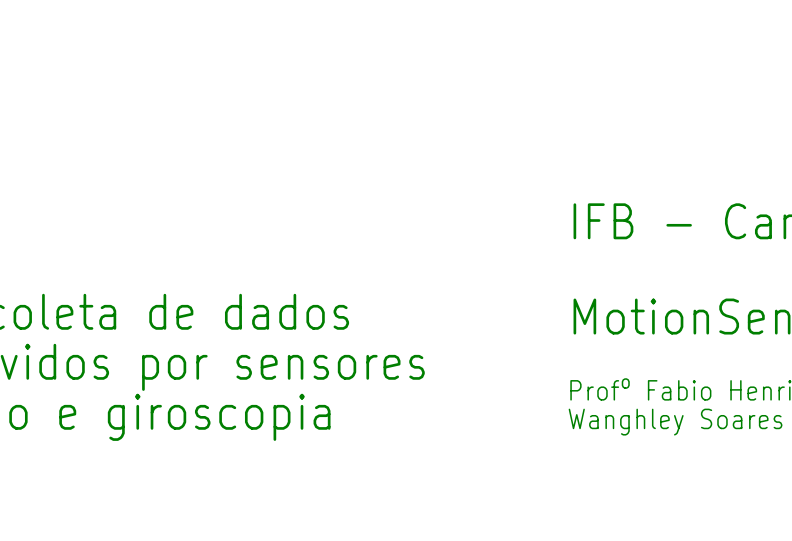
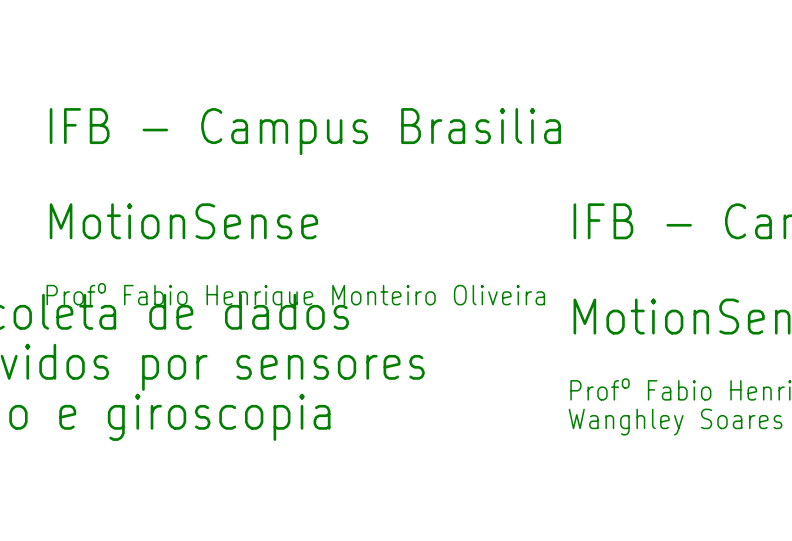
text: none -> IFB - Campus Brasilia (305, 131)
text: none -> MotionSense (183, 221)
text: none -> Profº Fabio Henrique Monteiro Oliveira (295, 297)

